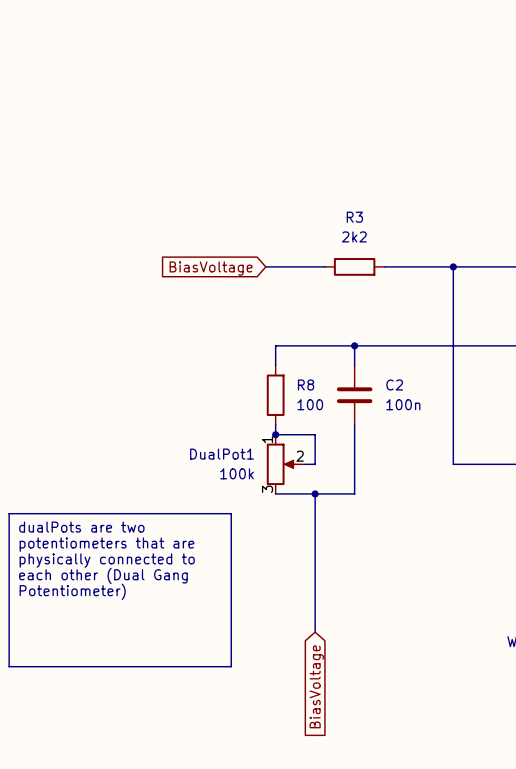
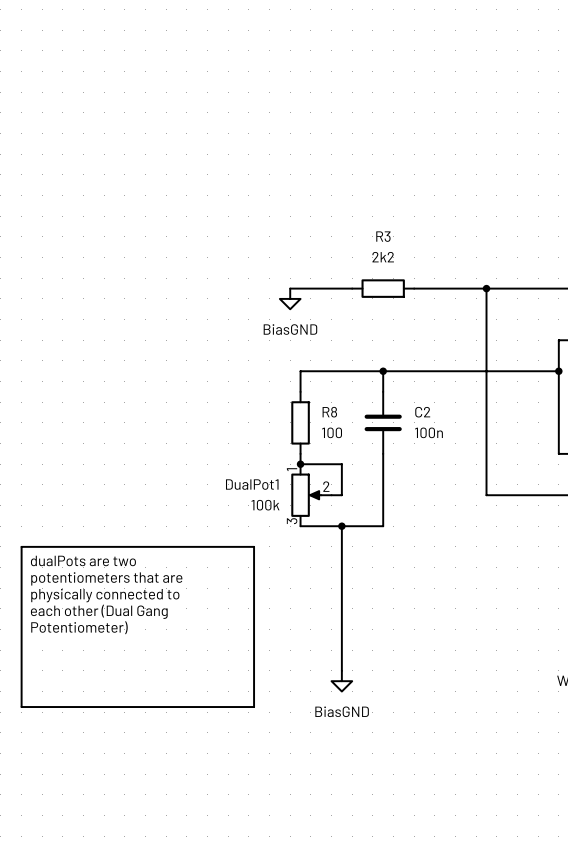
global label: BiasVoltage (211, 268) -> none
power symbol: none -> BiasGND (290, 298)
power symbol: none -> BiasGND (341, 681)
global label: BiasVoltage (316, 686) -> none

